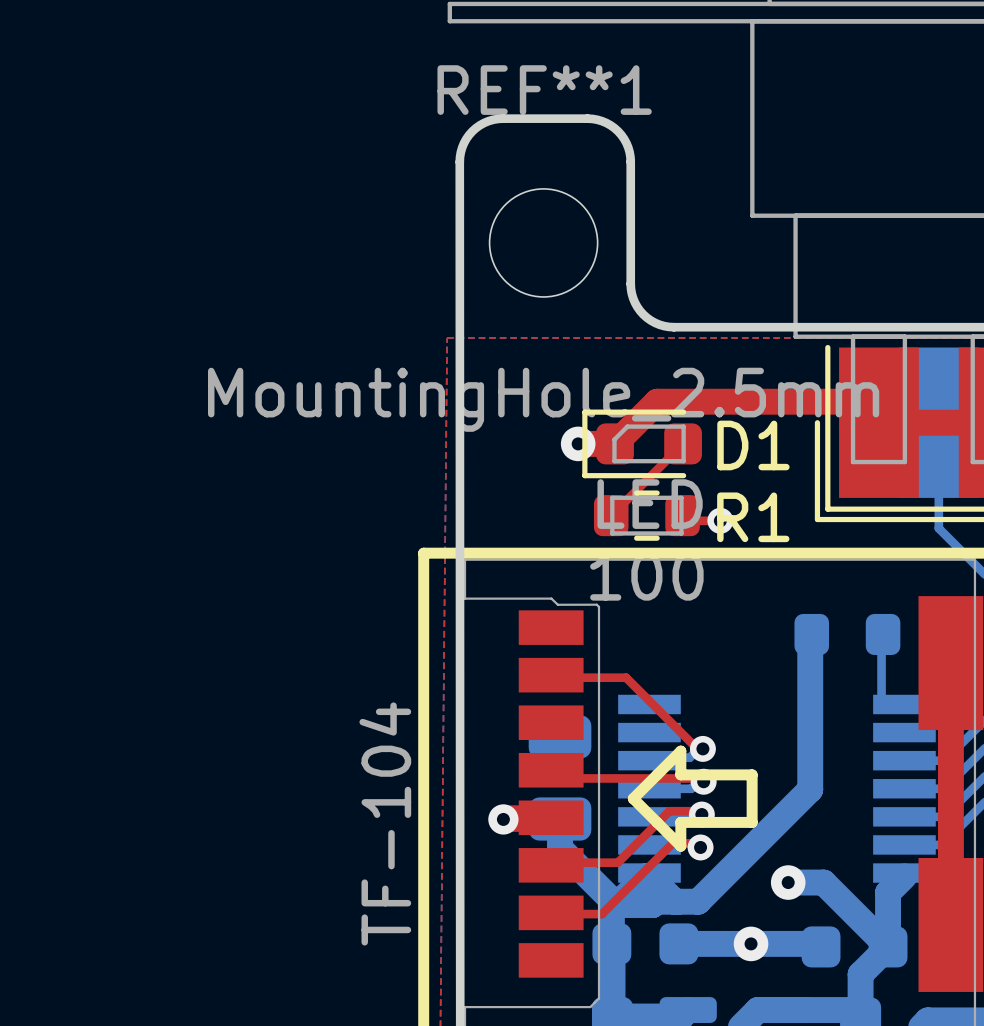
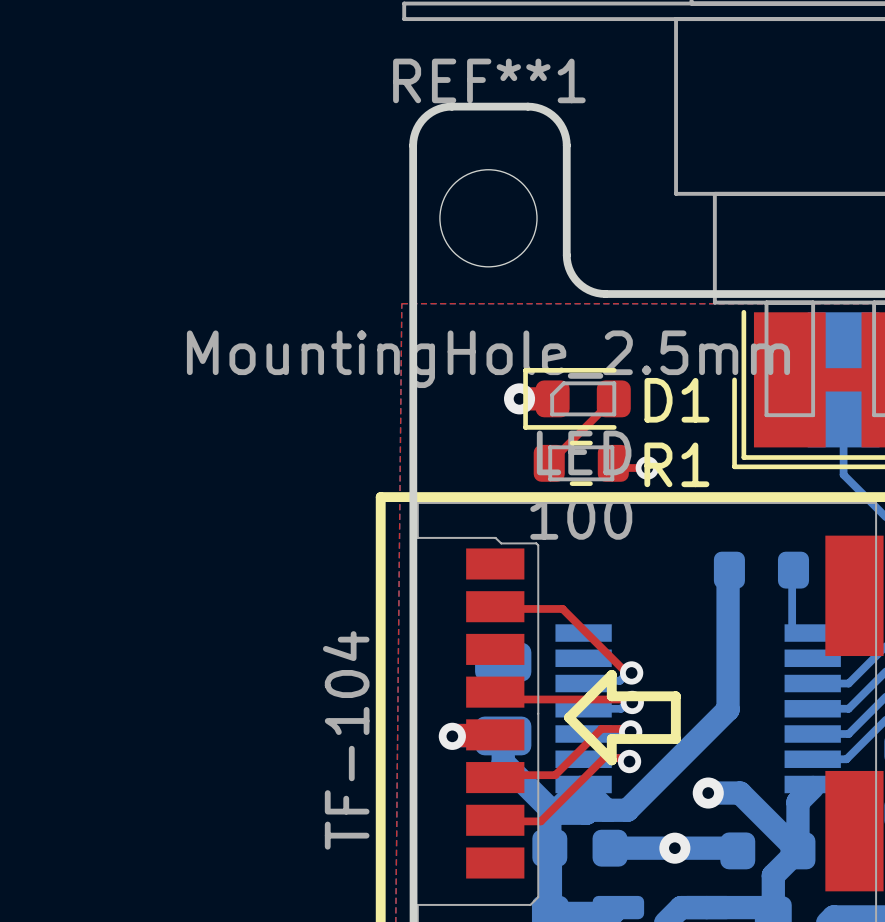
top track: (857, 401) (657, 401) (615, 443) -> none
top track: (950, 663) (950, 924) -> none

